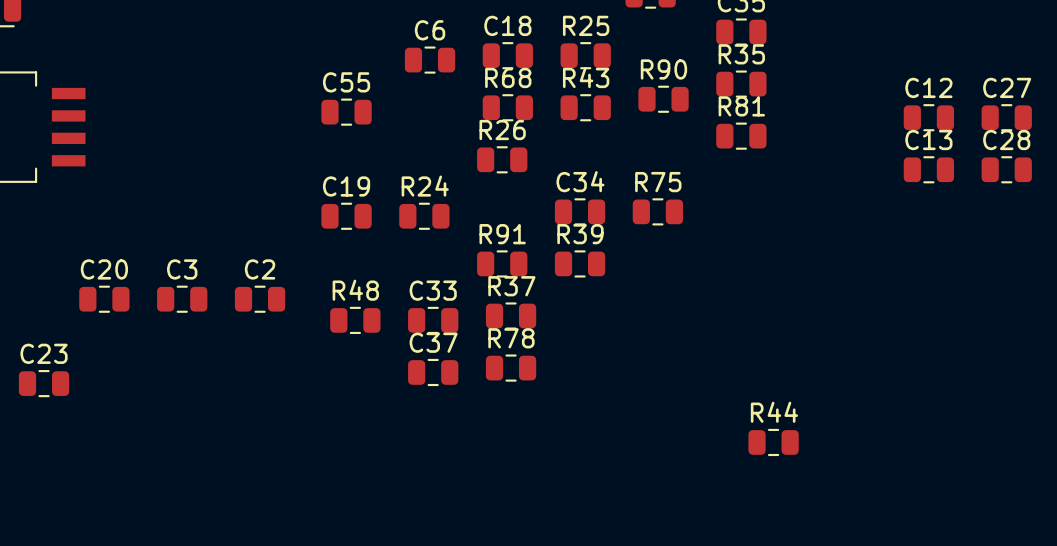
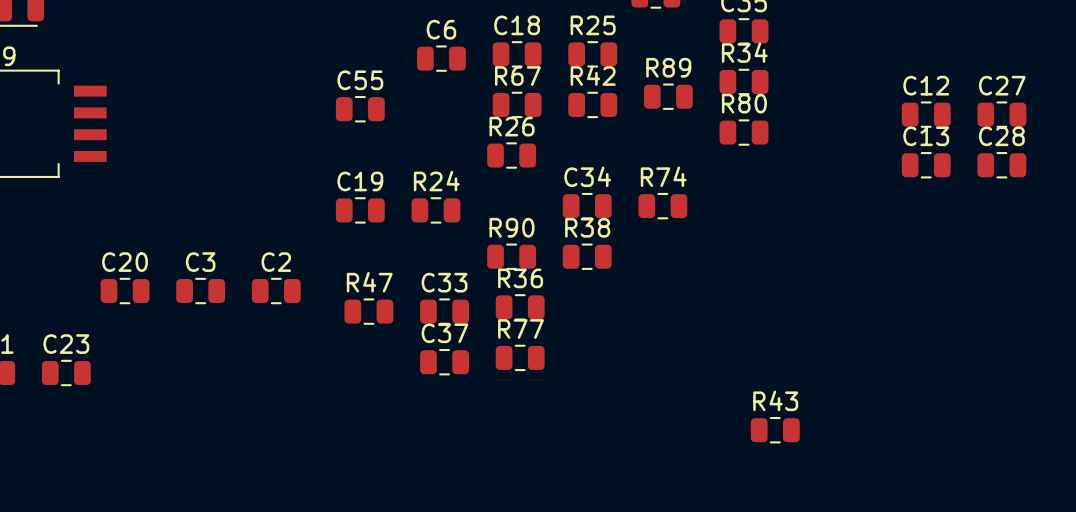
R35 name: R35 (741, 54) -> R34 (744, 52)
R90 name: R90 (663, 69) -> R89 (668, 67)
R68 name: R68 (508, 77) -> R67 (517, 75)
R43 name: R43 (586, 77) -> R42 (593, 75)
R81 name: R81 (741, 106) -> R80 (744, 103)
R75 name: R75 (658, 182) -> R74 (663, 176)
R91 name: R91 (502, 234) -> R90 (512, 227)
R39 name: R39 (580, 234) -> R38 (587, 227)
R37 name: R37 (511, 286) -> R36 (520, 278)
R48 name: R48 (355, 290) -> R47 (369, 282)
R78 name: R78 (511, 338) -> R77 (520, 328)
R44 name: R44 (774, 412) -> R43 (775, 400)

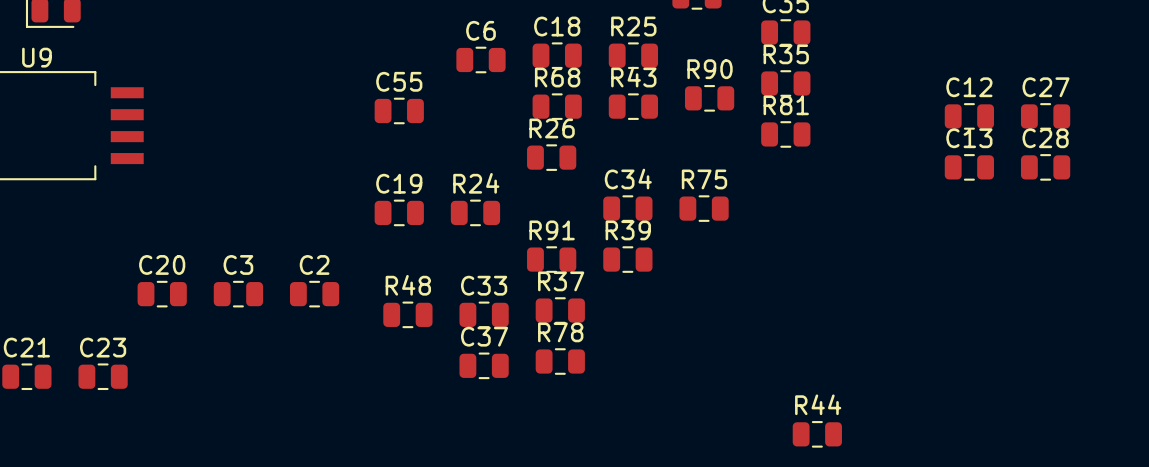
R34 name: R34 (744, 52) -> R35 (786, 54)
R89 name: R89 (668, 67) -> R90 (710, 69)
R67 name: R67 (517, 75) -> R68 (557, 77)
R42 name: R42 (593, 75) -> R43 (633, 77)
R80 name: R80 (744, 103) -> R81 (786, 105)
R74 name: R74 (663, 176) -> R75 (704, 179)
R90 name: R90 (512, 227) -> R91 (552, 230)
R38 name: R38 (587, 227) -> R39 (628, 230)
R36 name: R36 (520, 278) -> R37 (561, 281)
R47 name: R47 (369, 282) -> R48 (408, 285)
R77 name: R77 (520, 328) -> R78 (560, 332)
R43 name: R43 (775, 400) -> R44 (818, 404)

